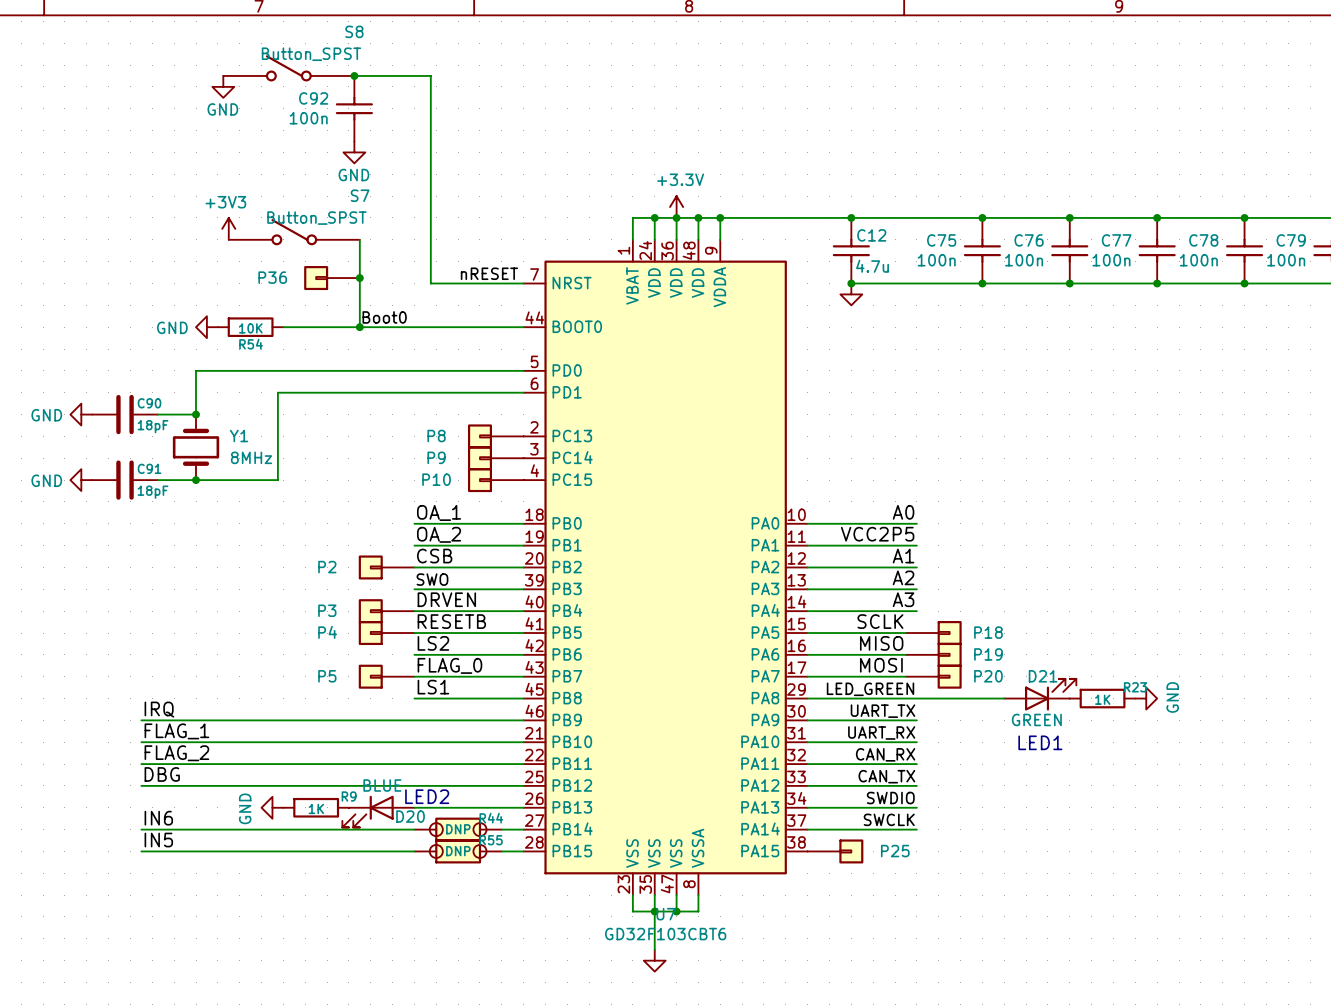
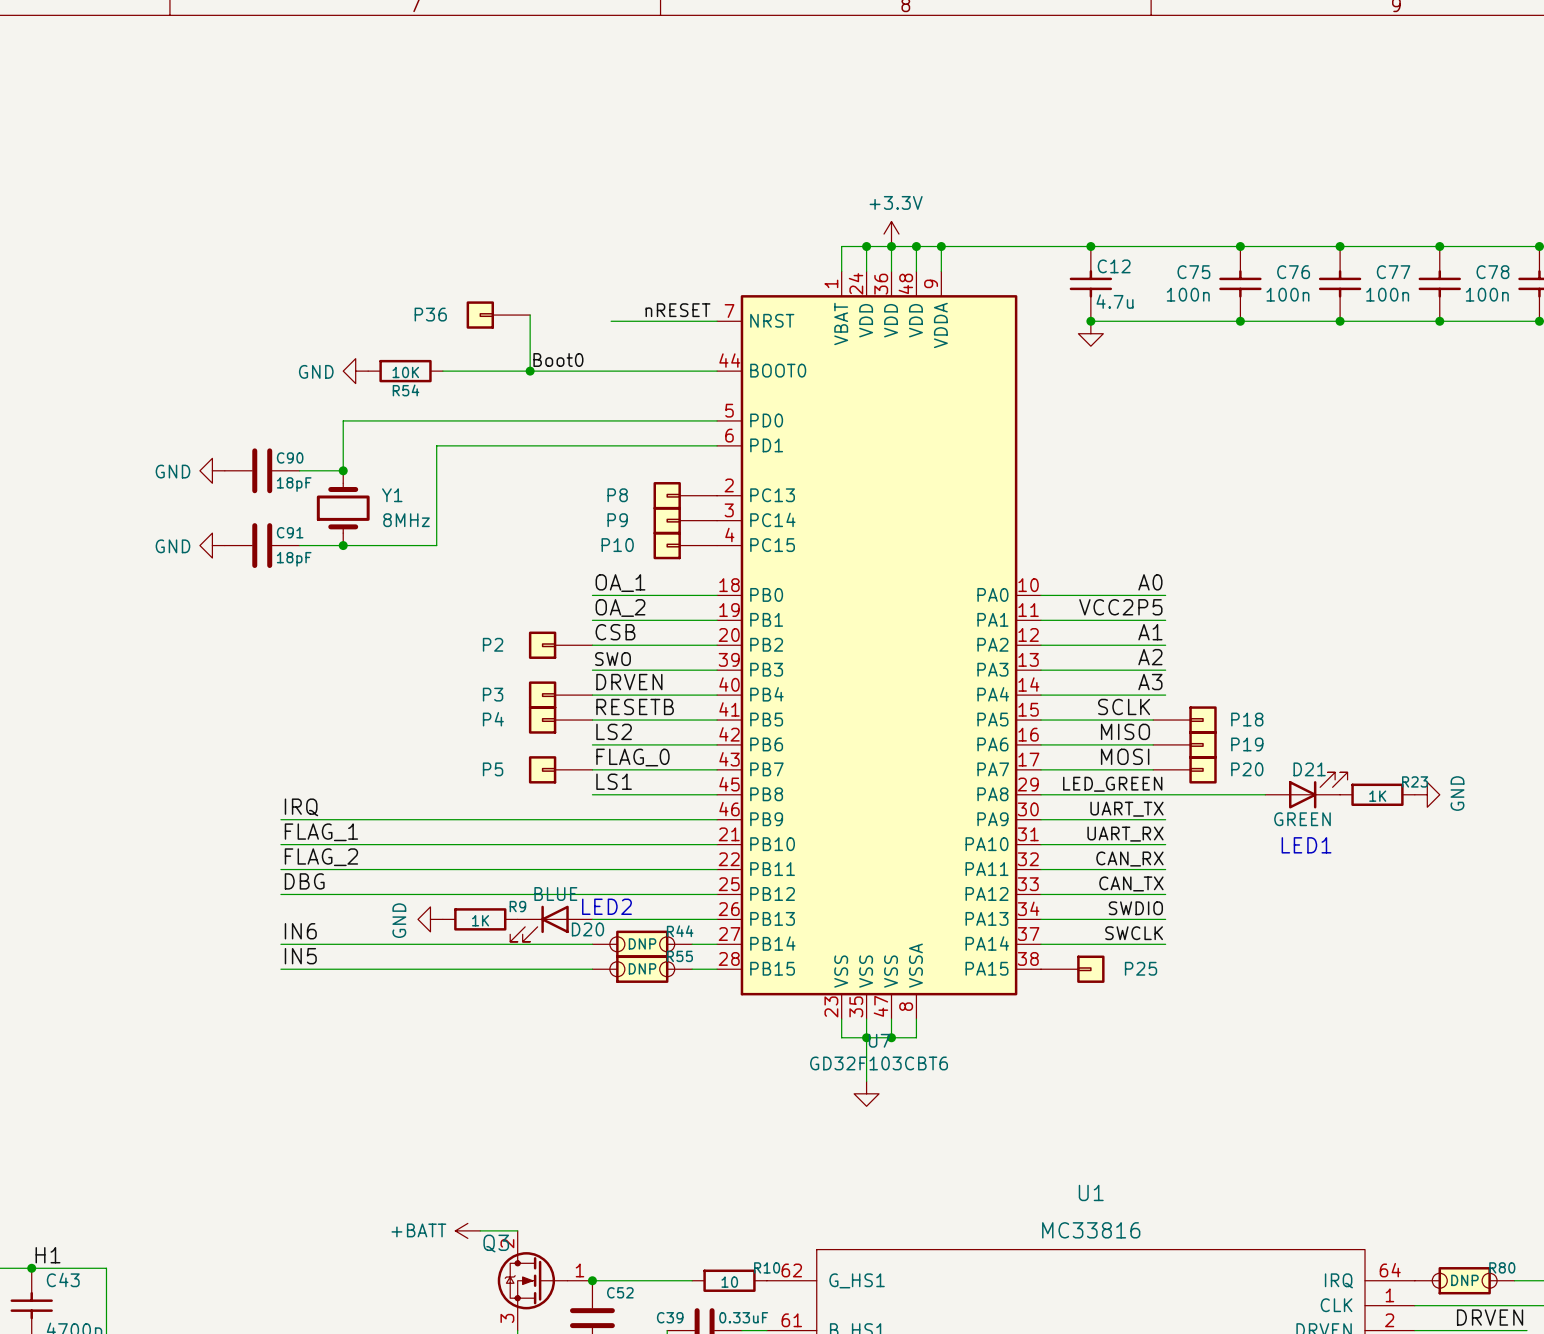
S8: Button_SPST (288, 68) -> none
wire: (354, 75) (430, 75) (430, 283) -> none
junction: (354, 75) -> none
power symbol: GND (223, 86) -> none
C92: 100n (354, 108) -> none
power symbol: GND (354, 152) -> none
power symbol: +3V3 (228, 228) -> none
S7: Button_SPST (294, 232) -> none
wire: (359, 239) (359, 278) -> none
junction: (359, 278) -> none

